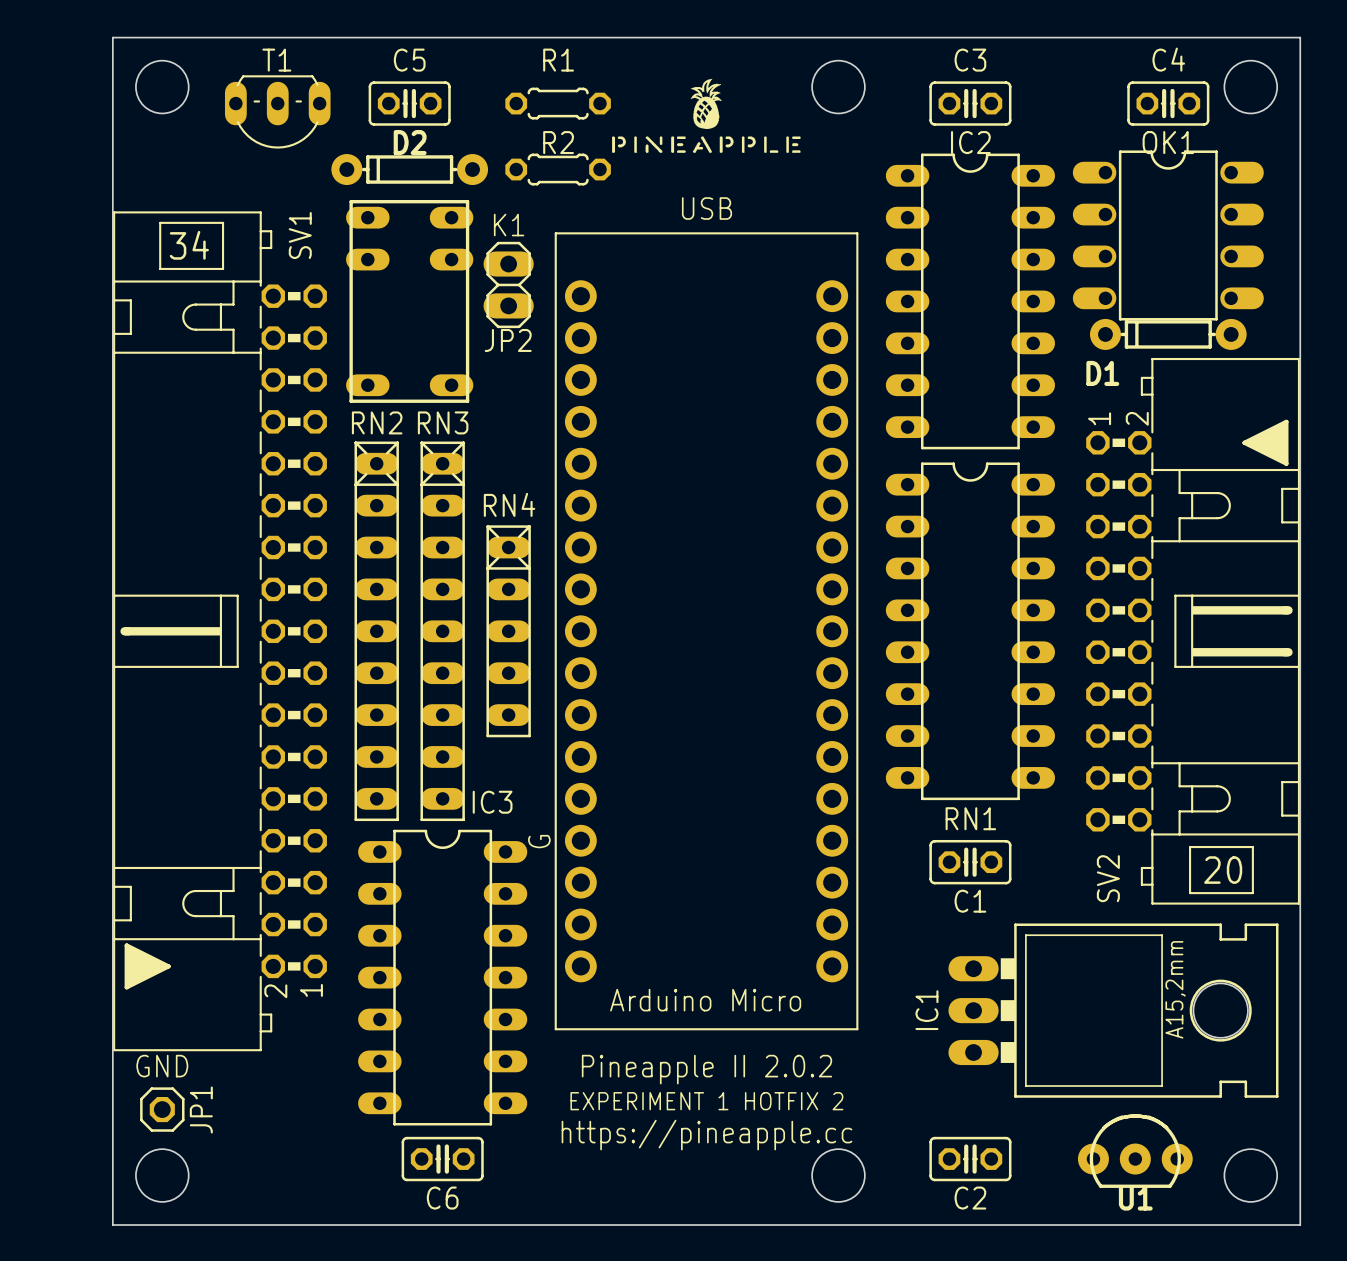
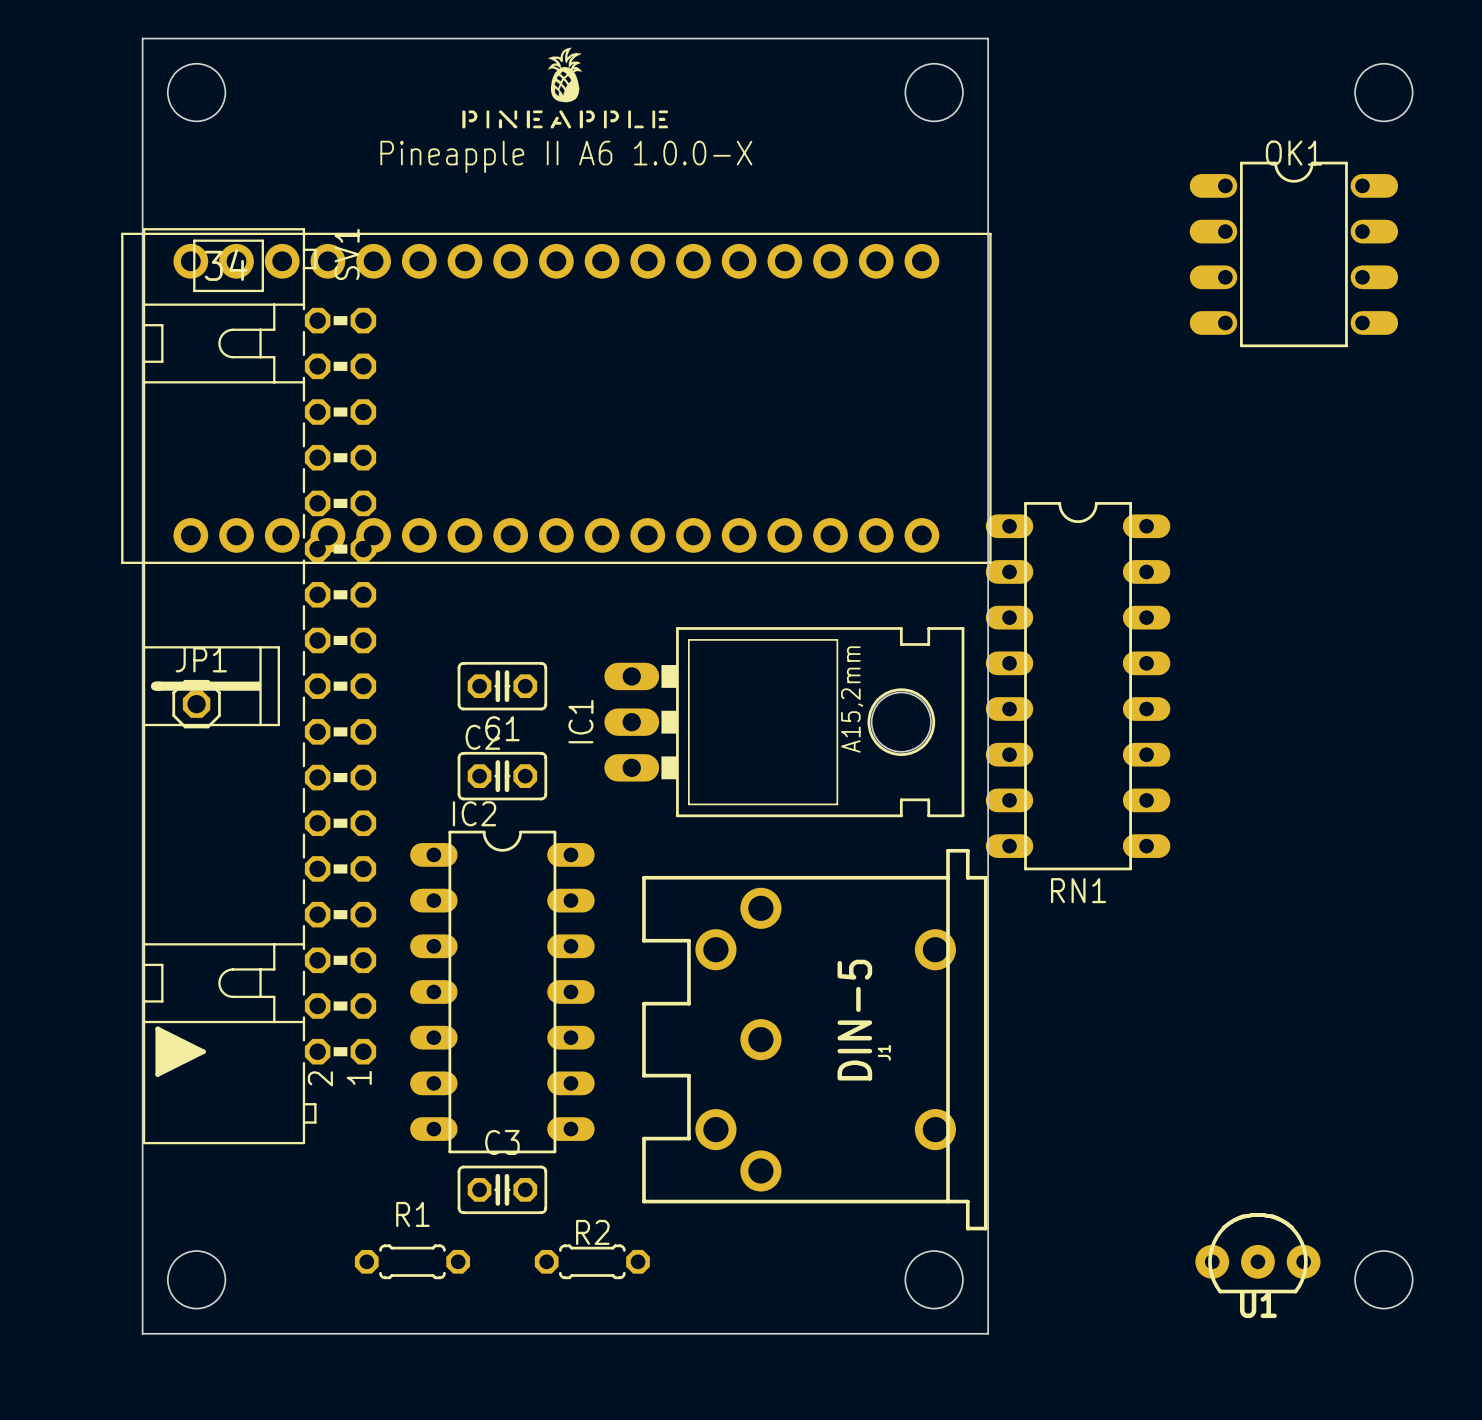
board edge: (887, 37) (1300, 37) (1300, 1225) (887, 1225) -> (988, 38) (988, 1333)
C5: (409, 103) -> none
R1 position: (558, 103) -> (412, 1261)
C3 position: (970, 103) -> (502, 1189)
C4: (1168, 103) -> none
T1: (277, 111) -> none
drawing position: (706, 115) -> (565, 87)
IC2 name position: IC2 (970, 142) -> IC2 (474, 813)
text: none -> Pineapple II A6 1.0.0-X (566, 156)
D2: (409, 169) -> none
R2 position: (558, 169) -> (592, 1261)
text: USB (706, 208) -> none
JP2: (508, 284) -> none
K1: (409, 301) -> none
IC2 position: (970, 301) -> (502, 991)
D1: (1168, 334) -> none
RN2: (376, 631) -> none
RN3: (442, 631) -> none
RN4: (508, 631) -> none
part rotation: 0° (706, 631) -> 90° clockwise (556, 398)
SV2: (1193, 631) -> none
text: G (539, 841) -> none
C1 position: (970, 862) -> (502, 686)
J1: none -> (814, 1039)
IC3: (442, 977) -> none
text: Arduino Micro (705, 1000) -> none
IC1 position: (1113, 1010) -> (784, 722)
text: GND (162, 1066) -> none
text: Pineapple II 2.0.2 (706, 1069) -> none
text: EXPERIMENT 1 HOTFIX 2 (706, 1101) -> none
JP1 position: (162, 1109) -> (196, 704)
JP1 name rotation: 0° (201, 1110) -> 90° clockwise (201, 659)
text: https://pineapple.cc (706, 1135) -> none
C6: (442, 1159) -> none
C2 position: (970, 1159) -> (502, 776)
C2 name position: C2 (970, 1198) -> C2 (482, 737)

